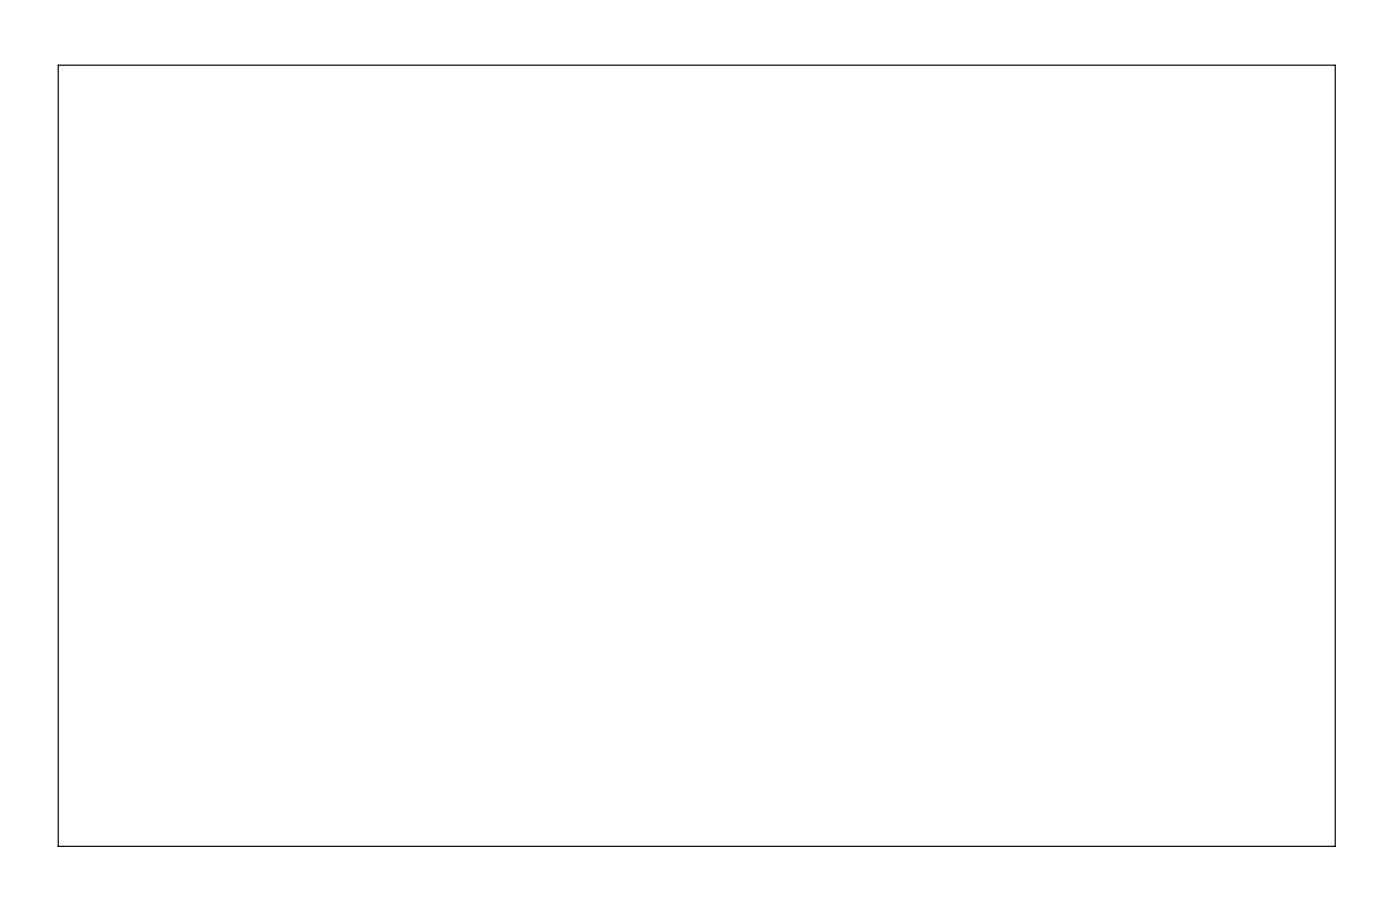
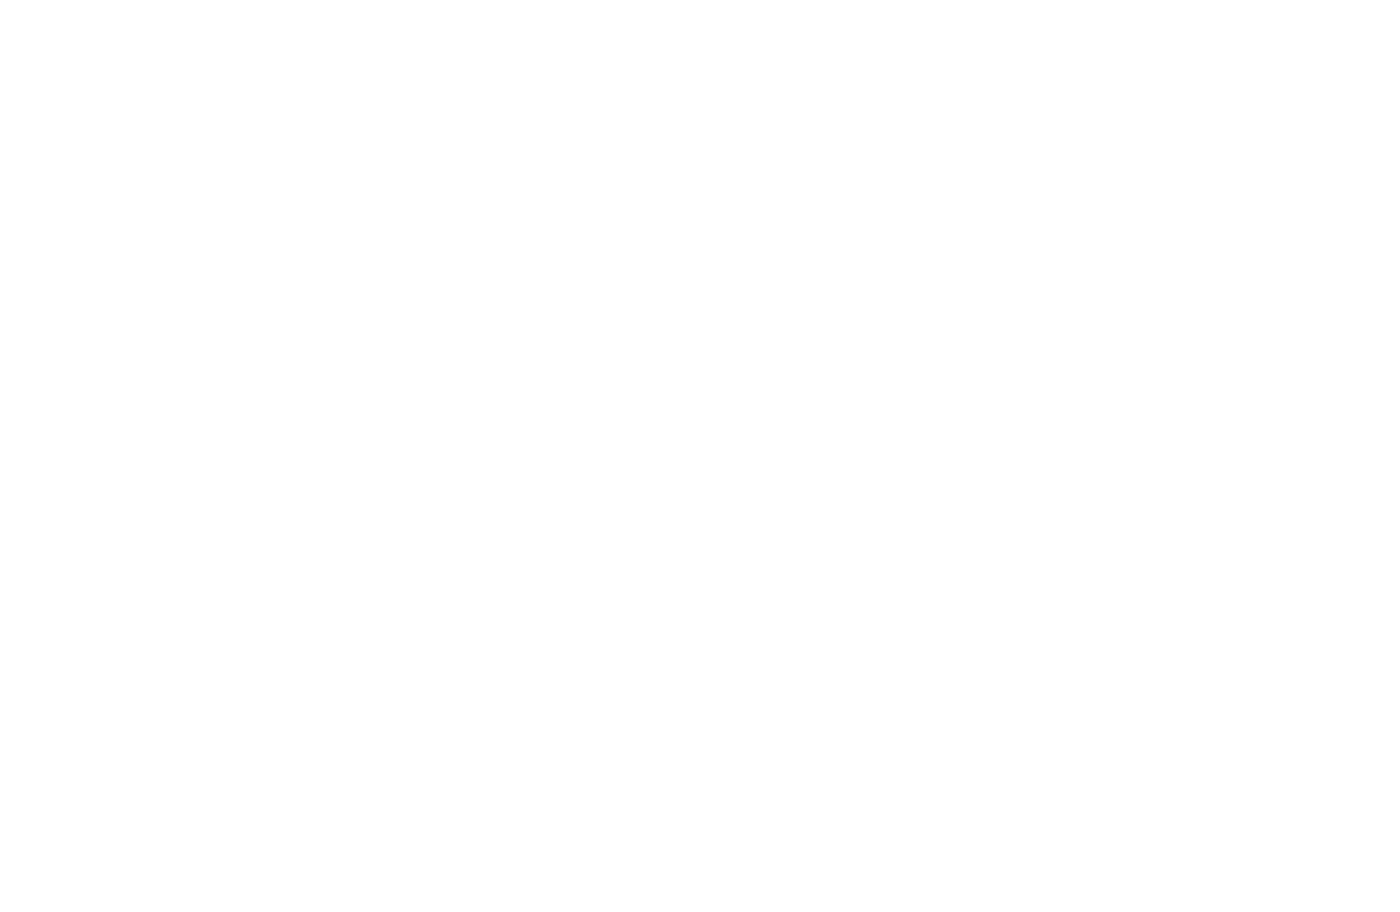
board edge: (58, 65) (1335, 65) (1335, 846) (58, 846) (58, 65) -> none

